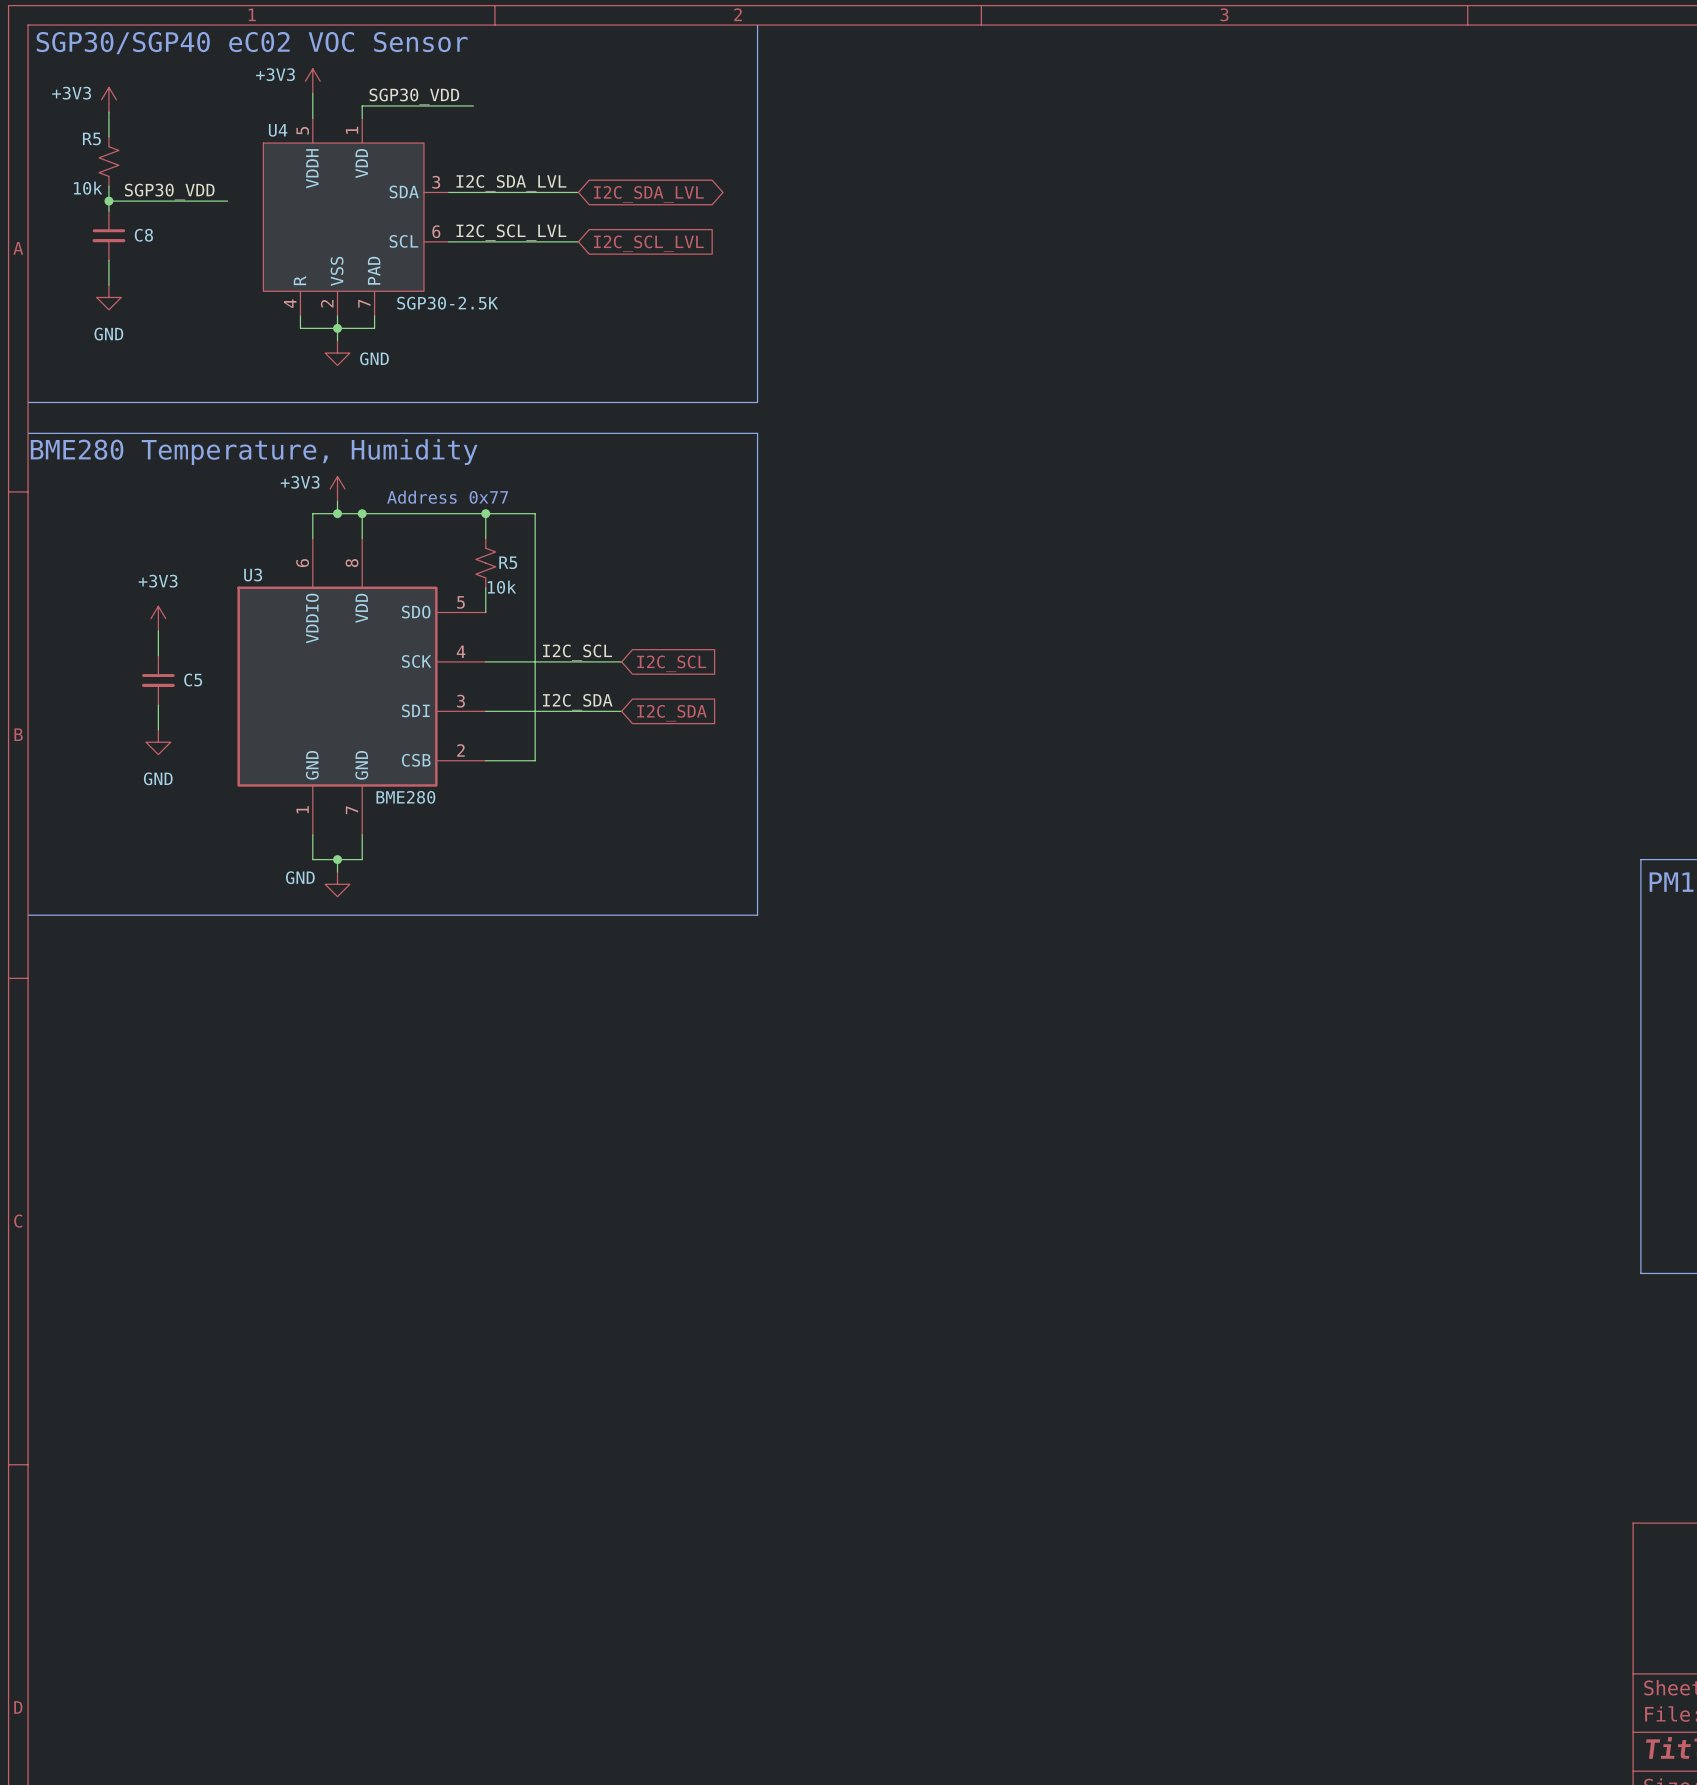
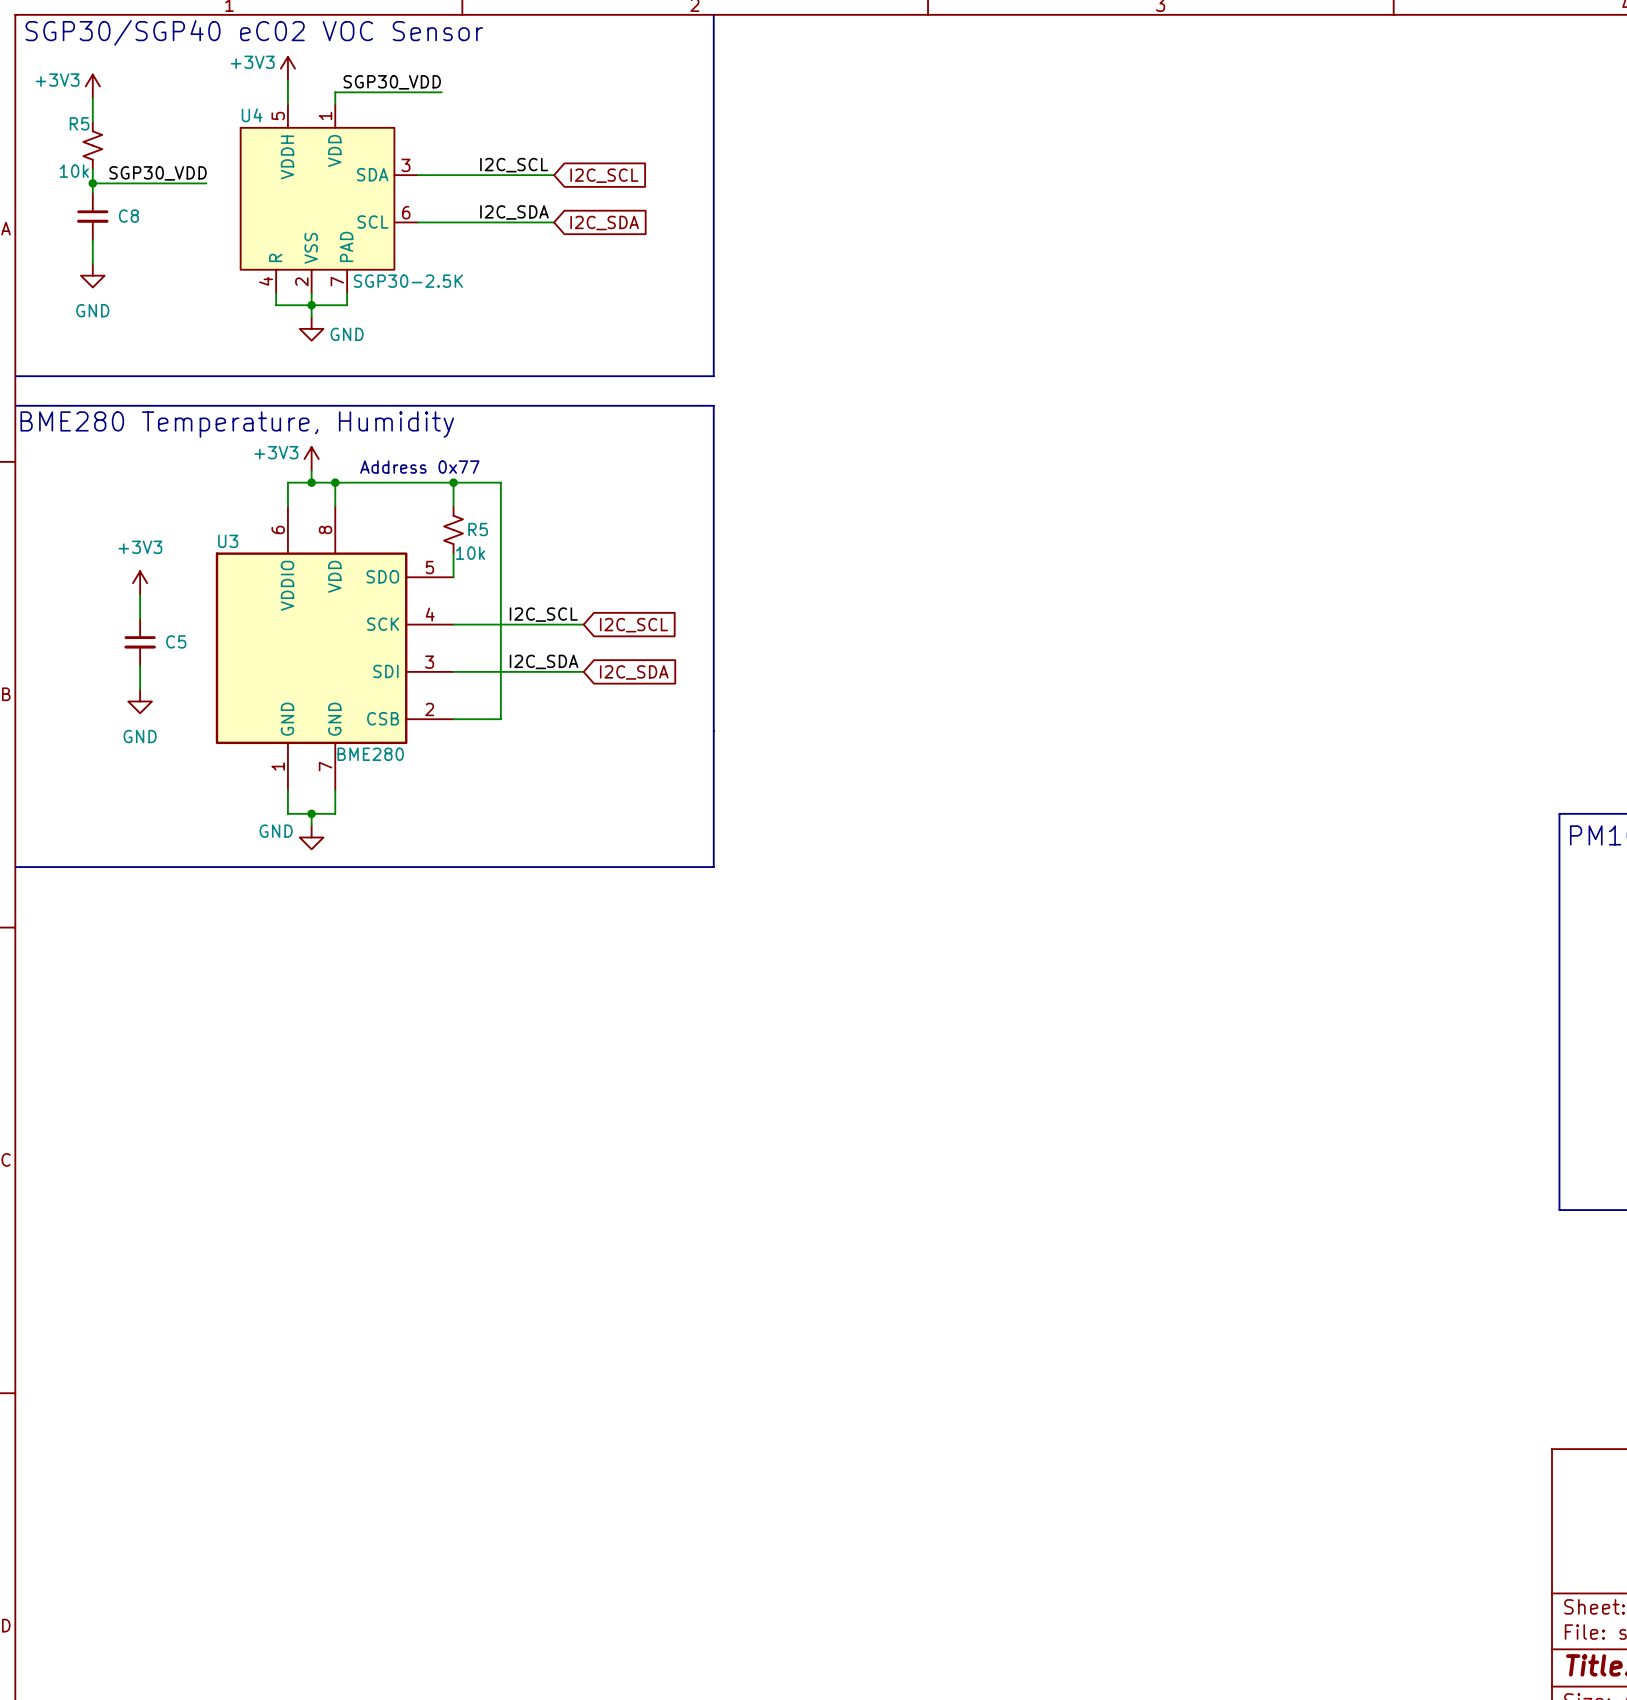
label: I2C_SDA_LVL (511, 183) -> I2C_SCL (514, 165)
wire: none -> (542, 175) (554, 175)
global label shape: bidirectional (648, 194) -> input (604, 175)
global label: I2C_SDA_LVL (648, 194) -> I2C_SCL (604, 175)
label: I2C_SCL_LVL (511, 232) -> none
label: none -> I2C_SDA (514, 212)
wire: none -> (542, 222) (554, 222)
global label: none -> I2C_SDA (604, 223)
global label: I2C_SCL_LVL (648, 243) -> none

